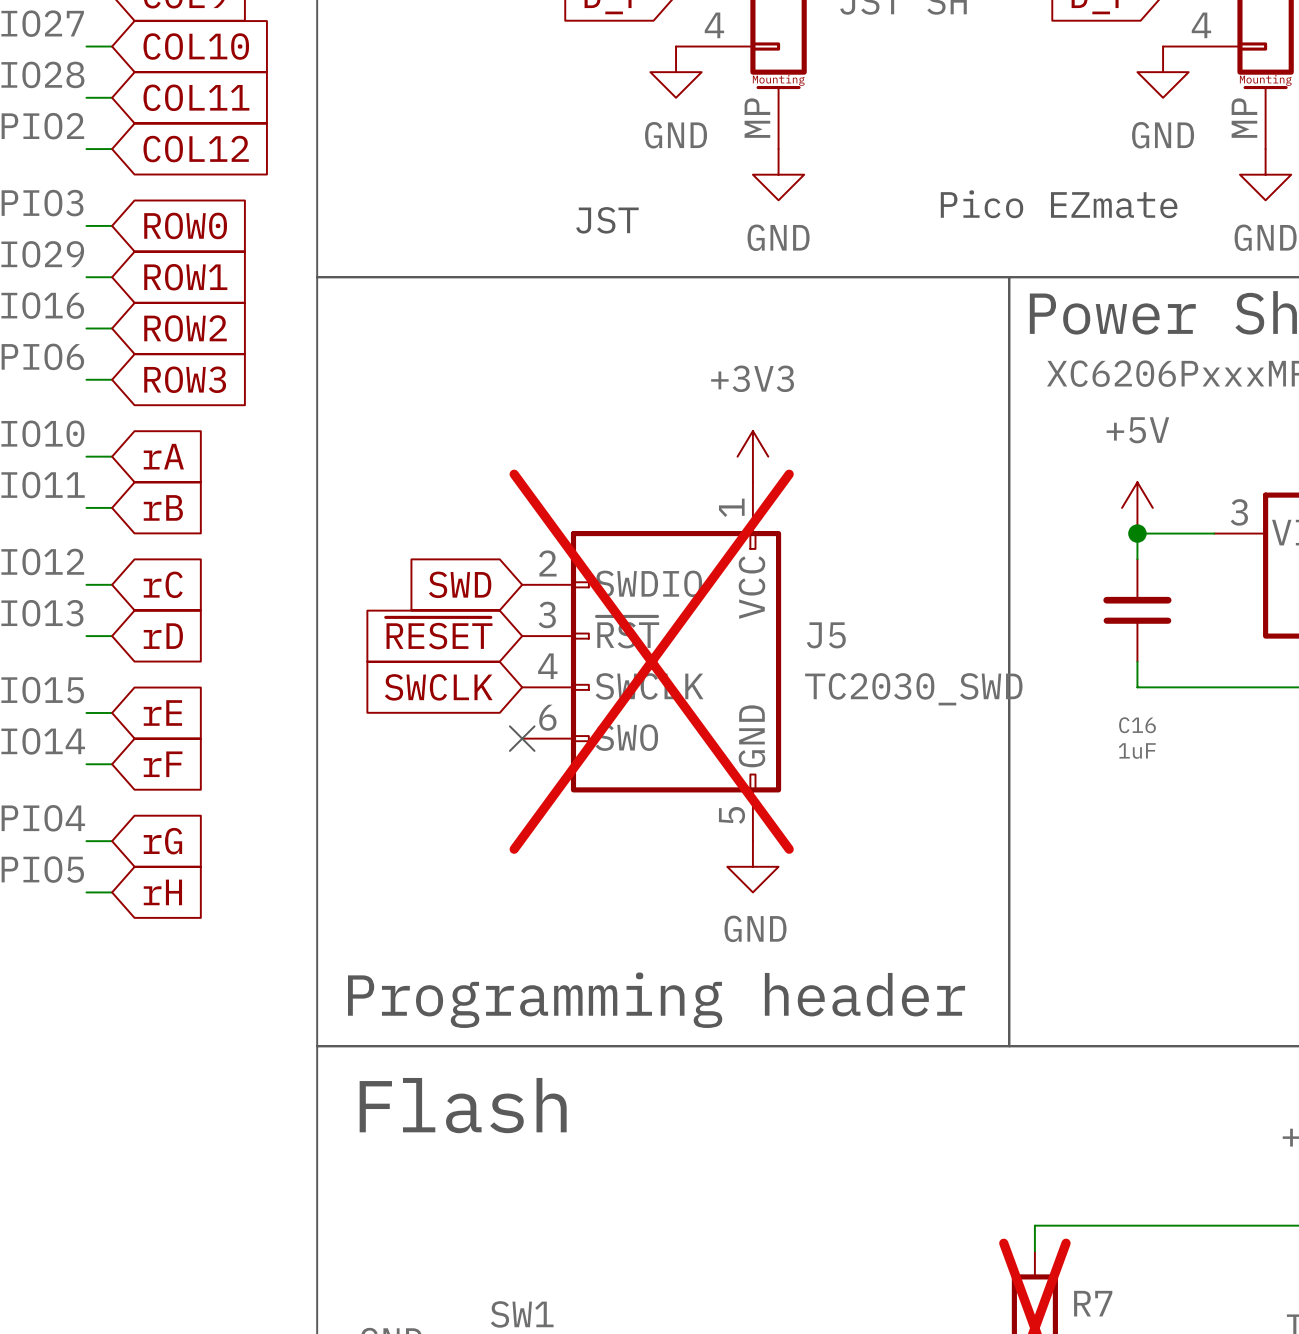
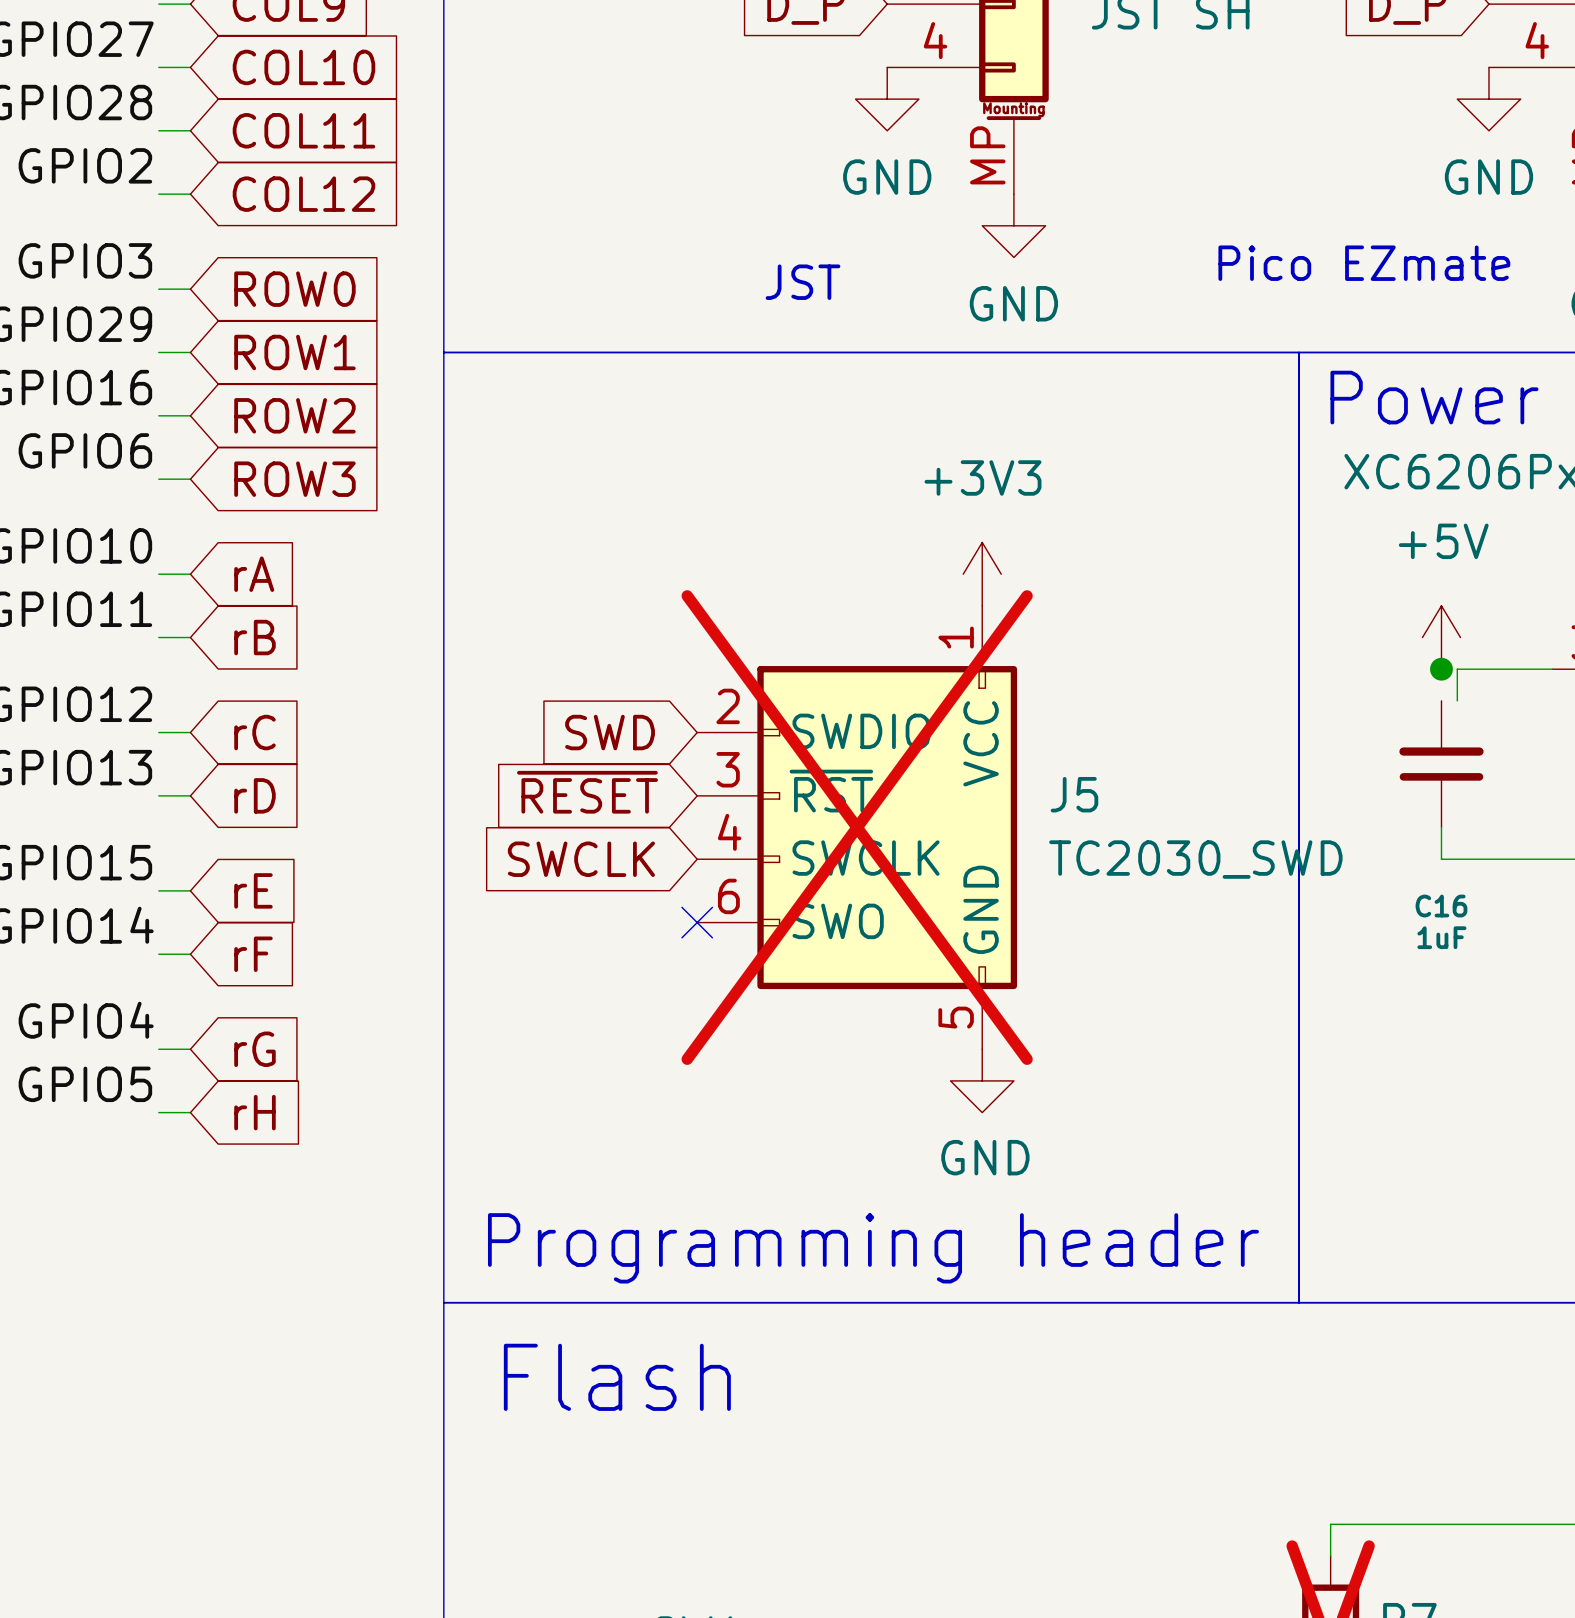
power symbol position: +5V (1137, 507) -> +5V (1441, 637)
junction position: (1137, 533) -> (1441, 669)
C16 position: (1137, 610) -> (1441, 764)
wire: (1137, 661) (1137, 687) -> (1441, 827) (1441, 859) (1457, 859)

